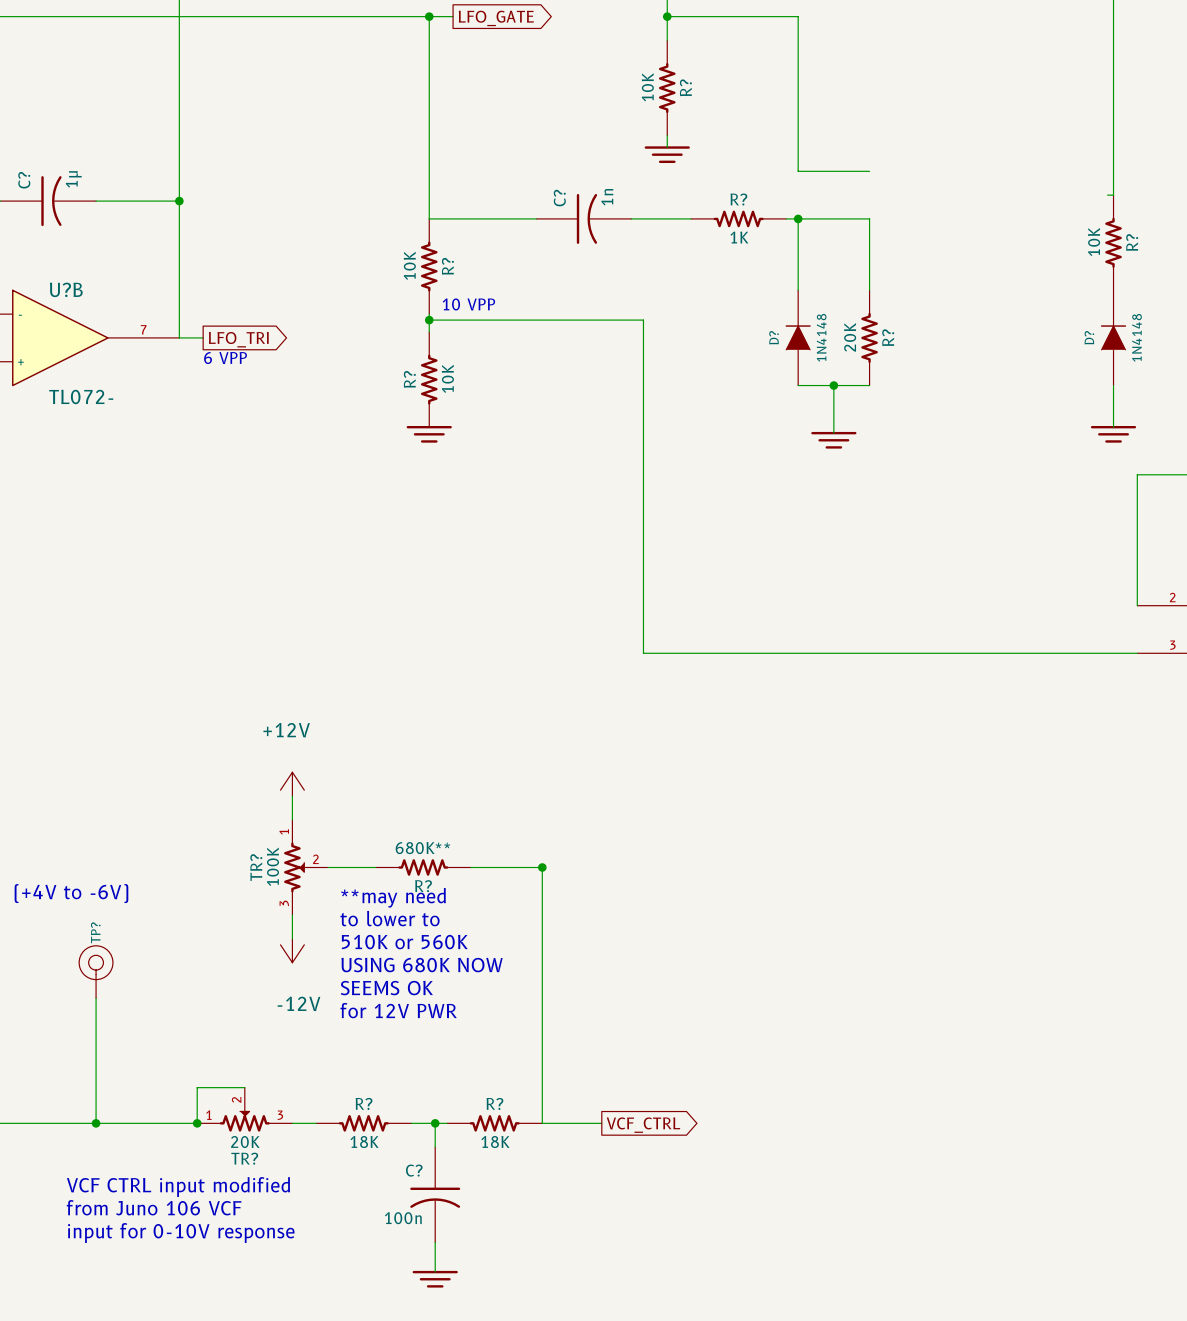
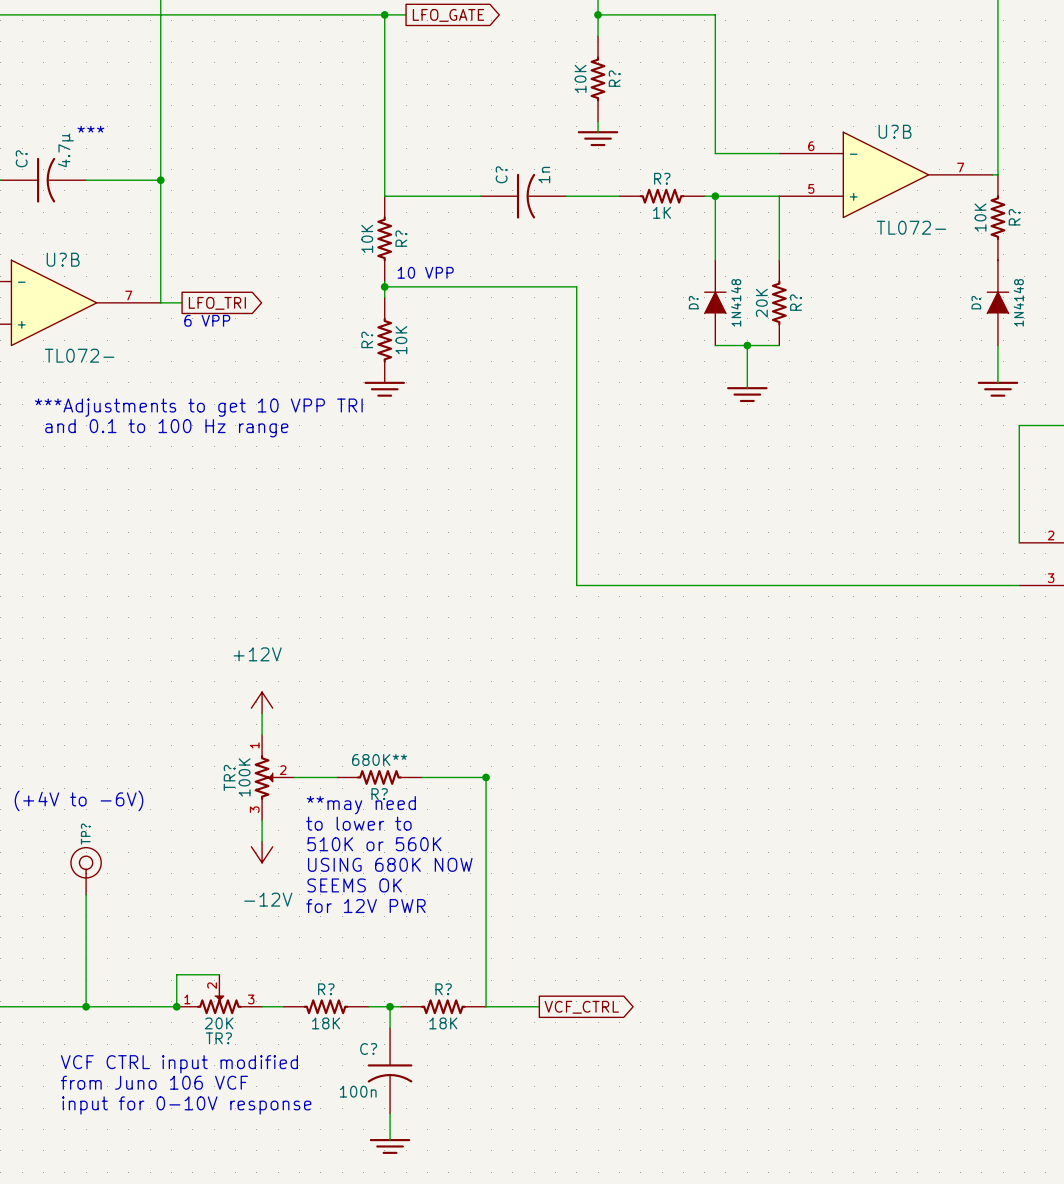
text: none -> *** (90, 129)
C? value: 1μ (73, 179) -> 4.7μ (65, 150)
U?B: none -> TL072- (885, 174)
text: none -> ***Adjustments to get 10 VPP TRI (198, 407)
text: none -> and 0.1 to 100 Hz range (166, 428)

